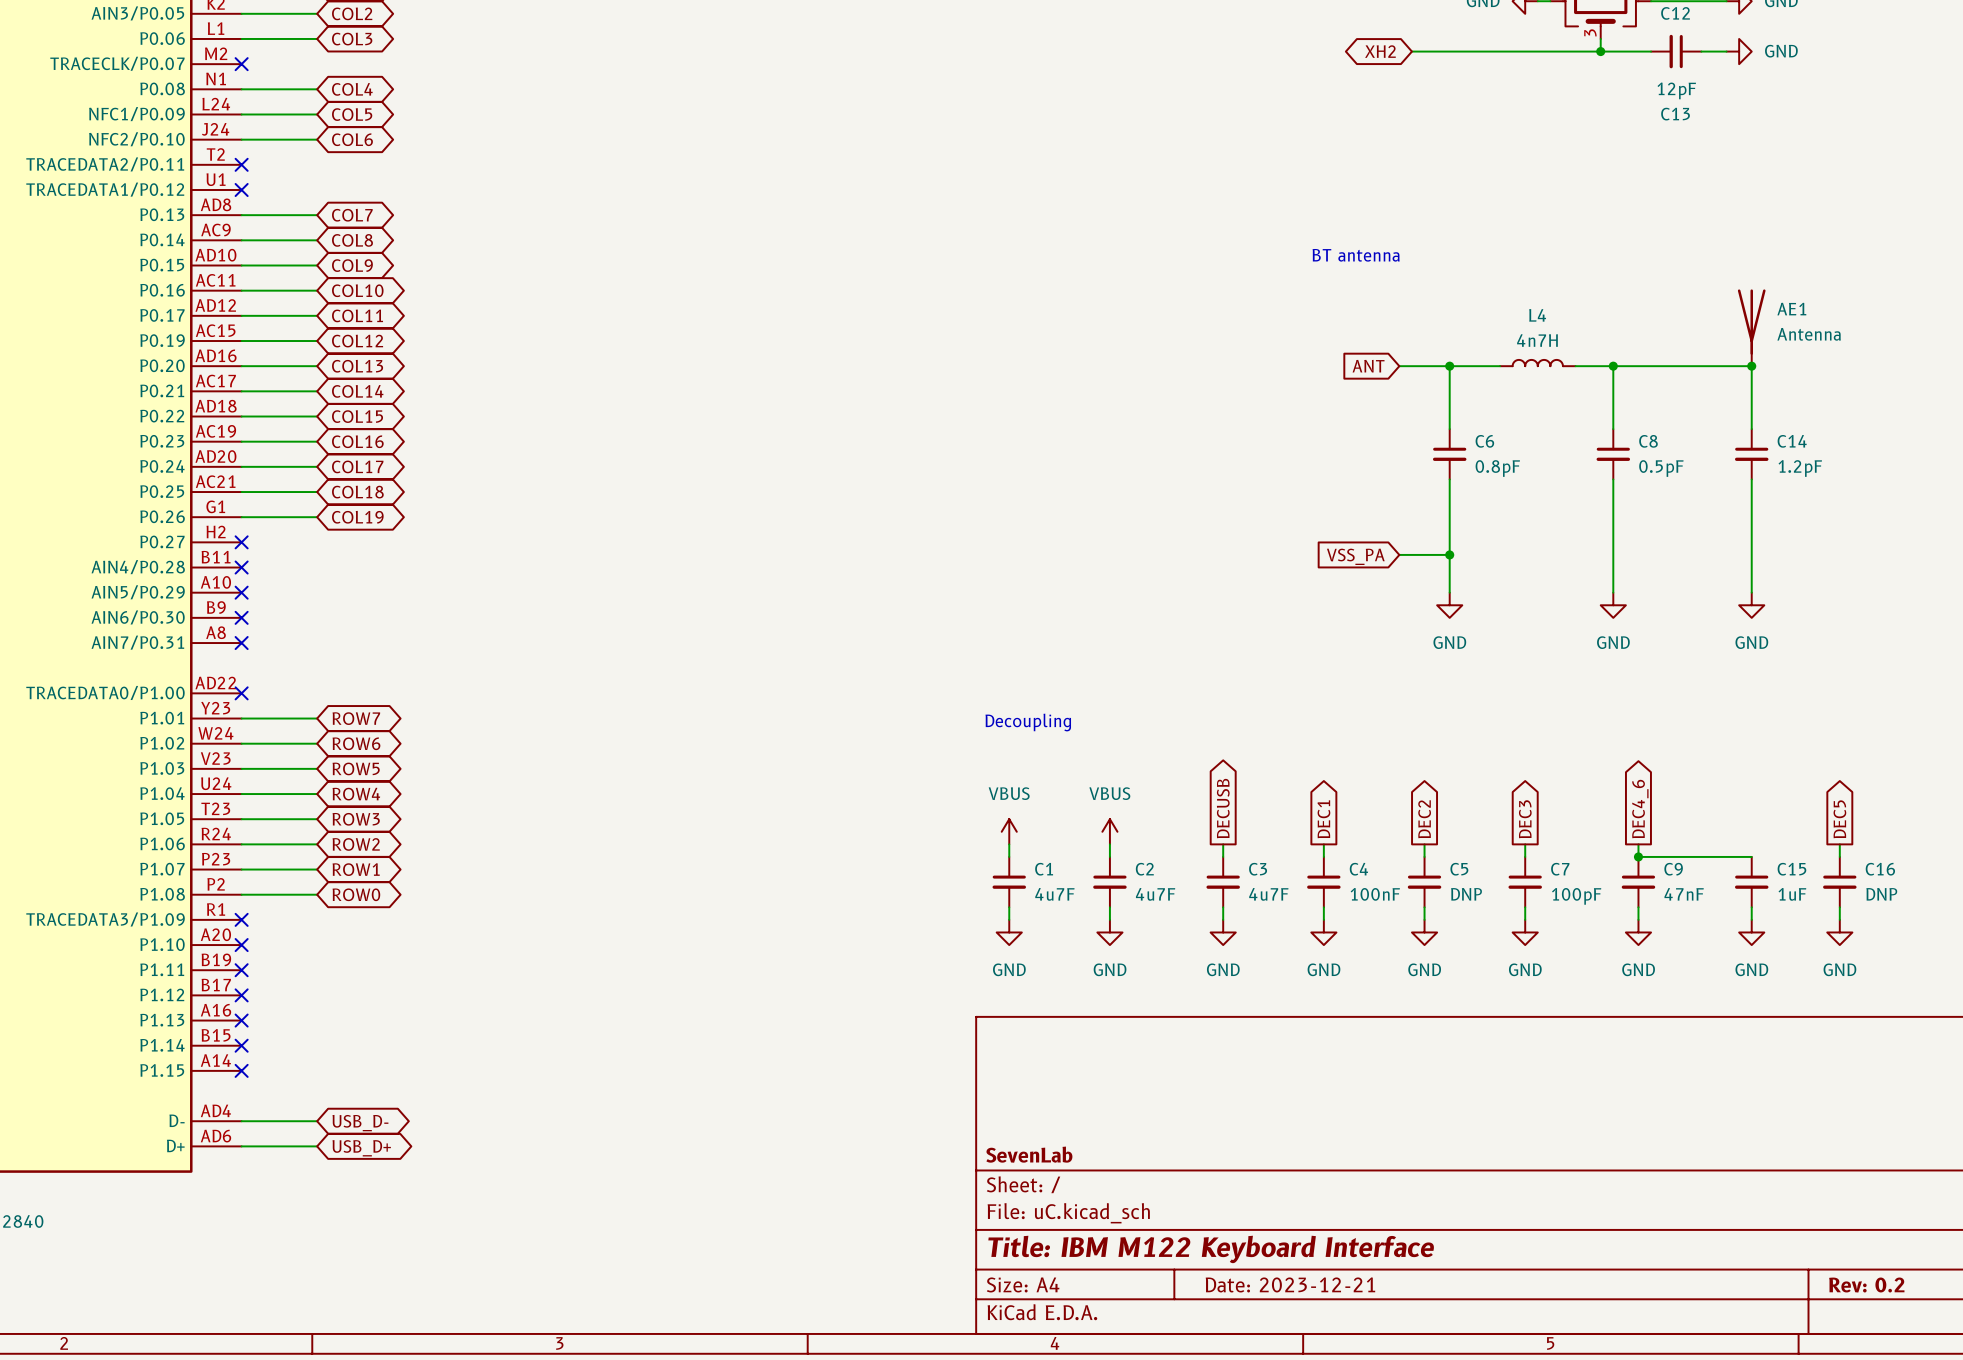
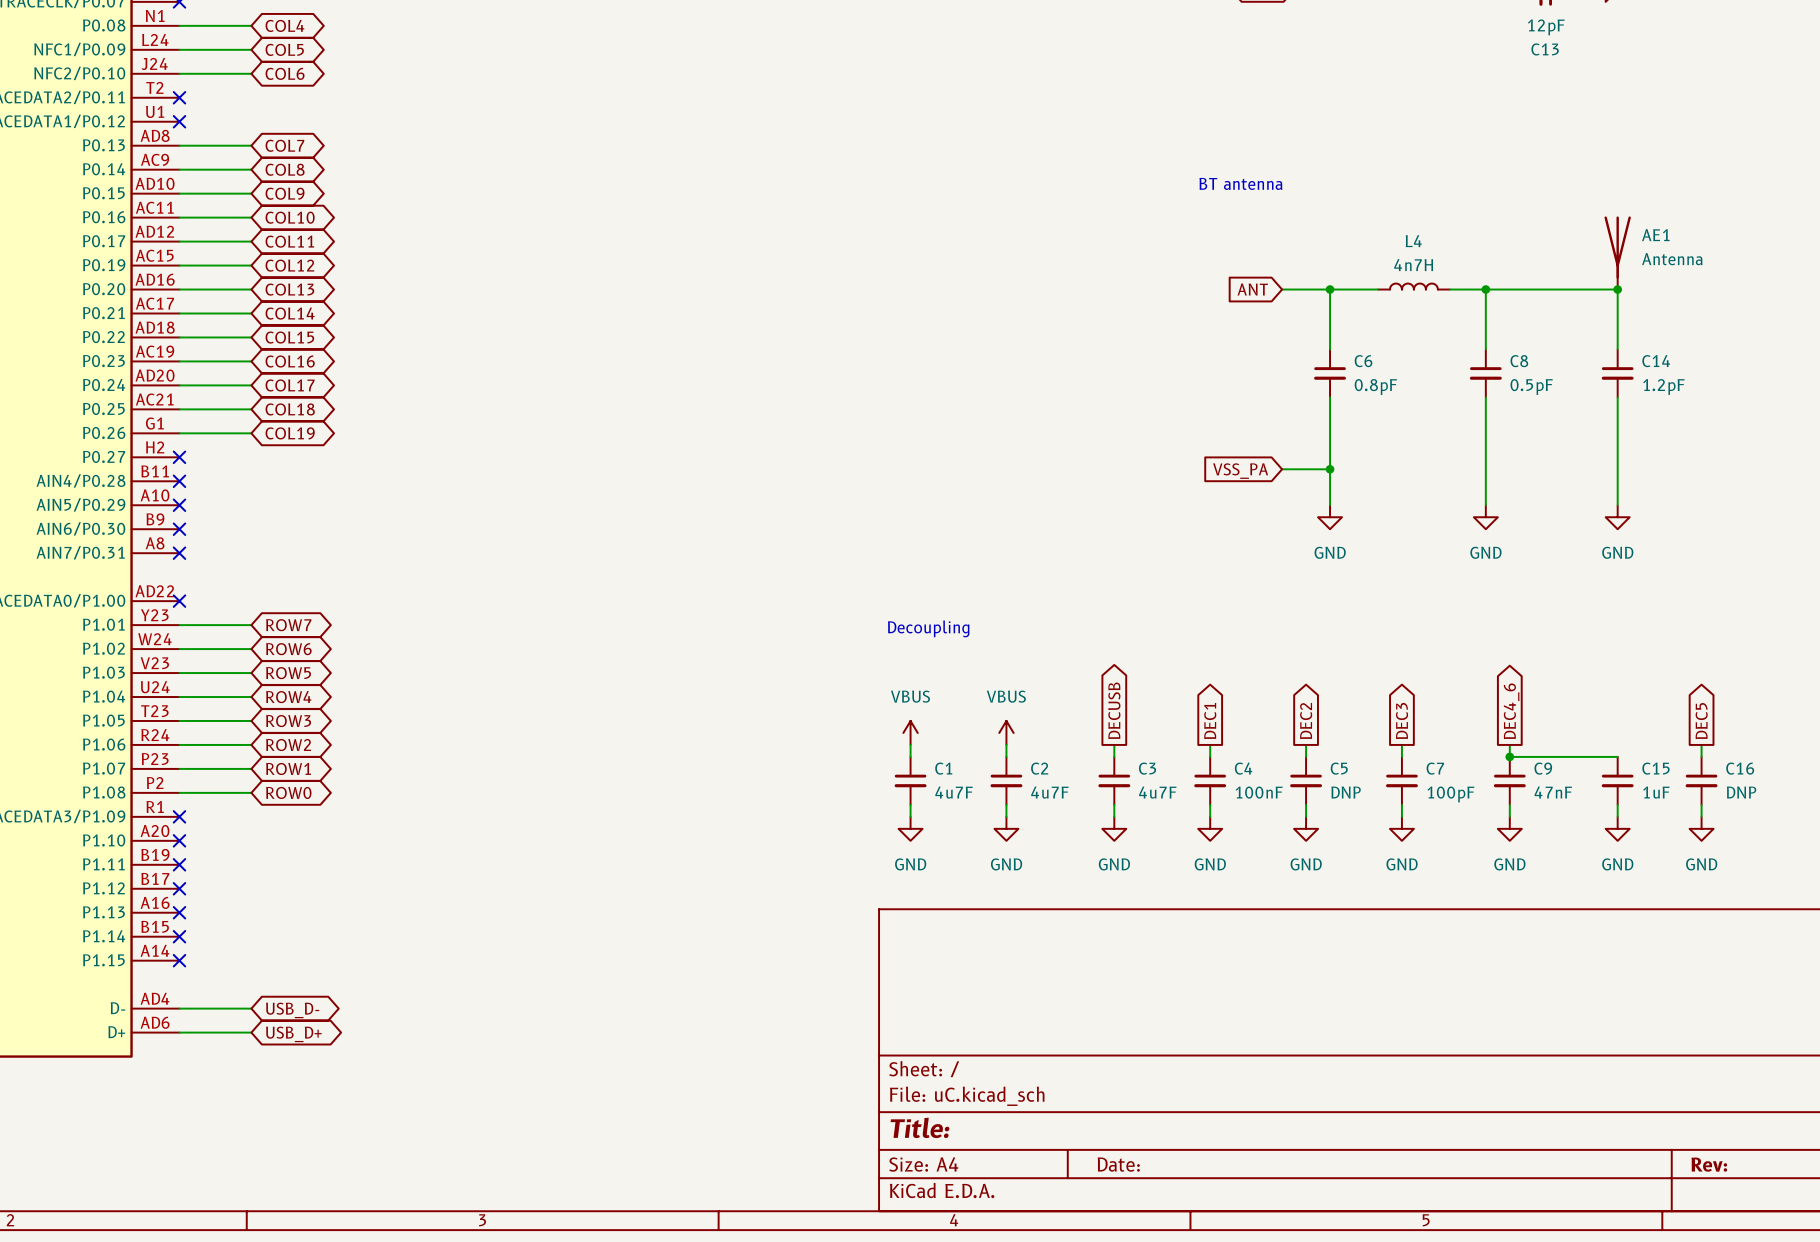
title block: SevenLab (1029, 1154) -> none
title block: Title: IBM M122 Keyboard Interface (1211, 1249) -> Title: (920, 1127)
title block: Date: 2023-12-21 (1290, 1284) -> Date: (1118, 1164)
title block: Rev: 0.2 (1866, 1285) -> Rev: (1709, 1164)

